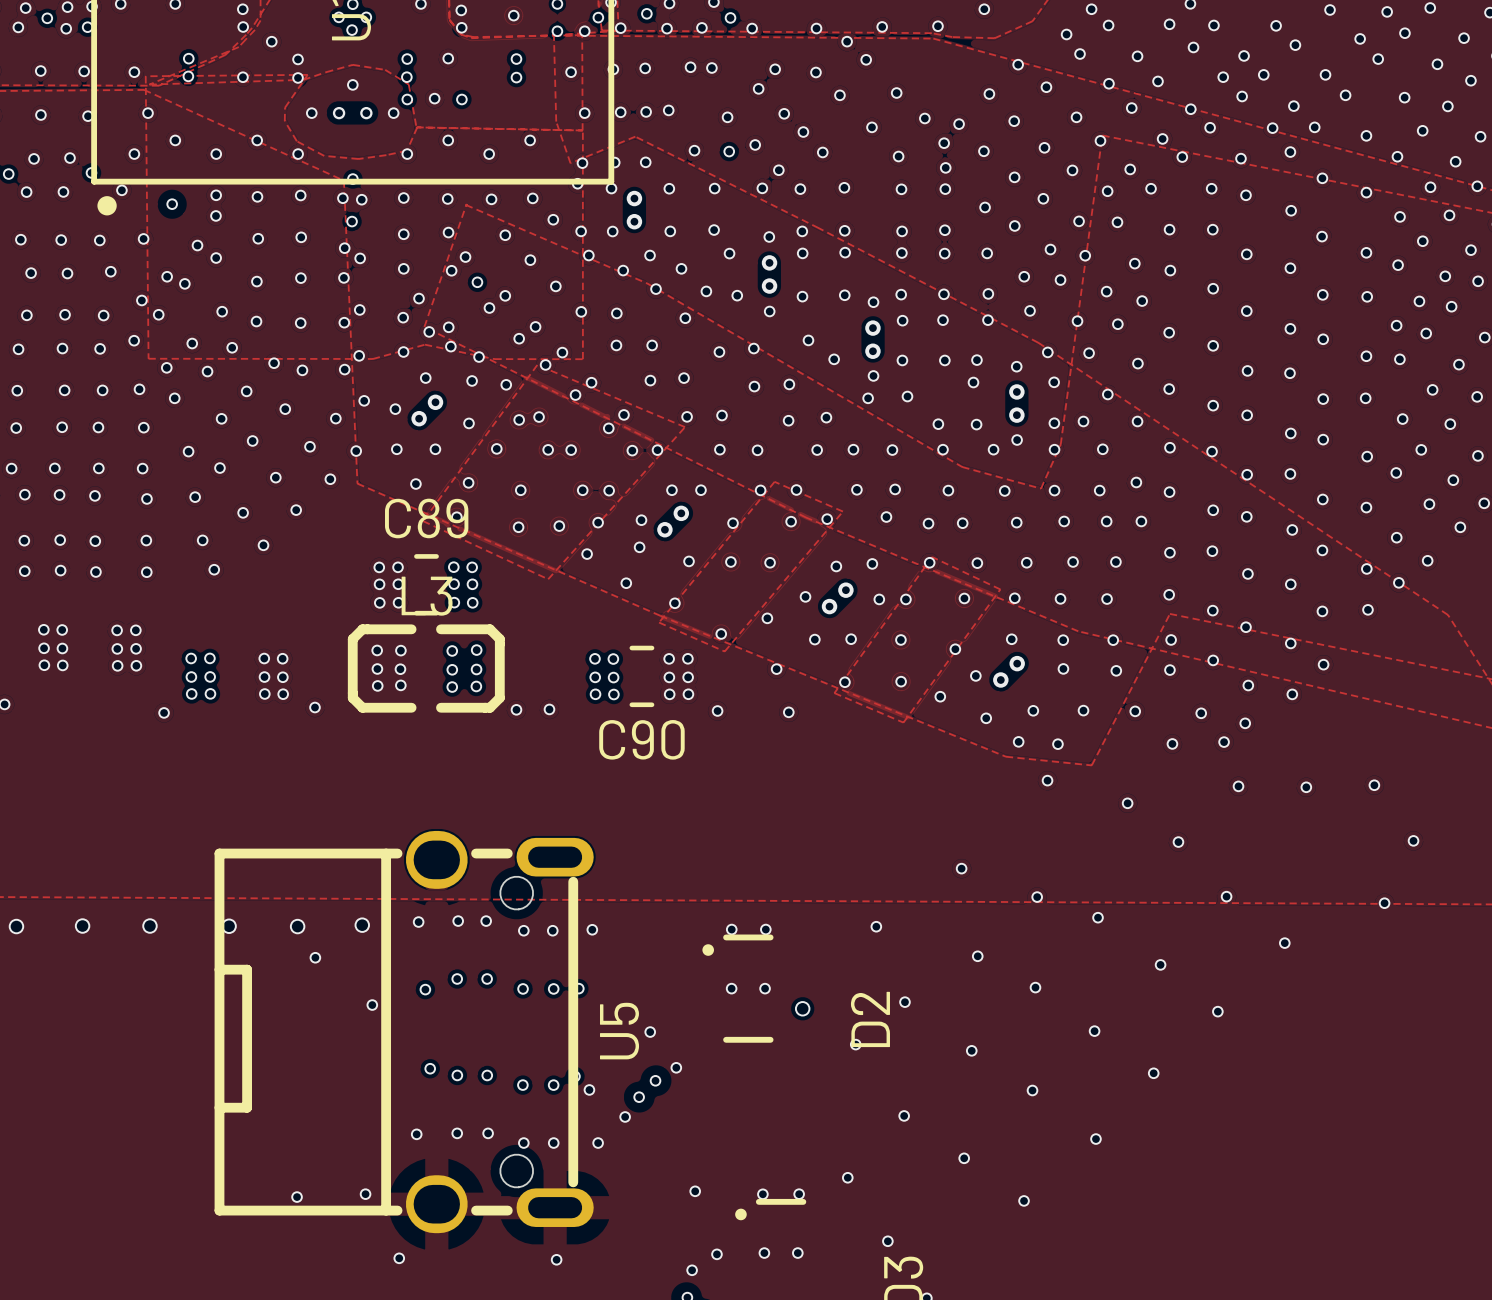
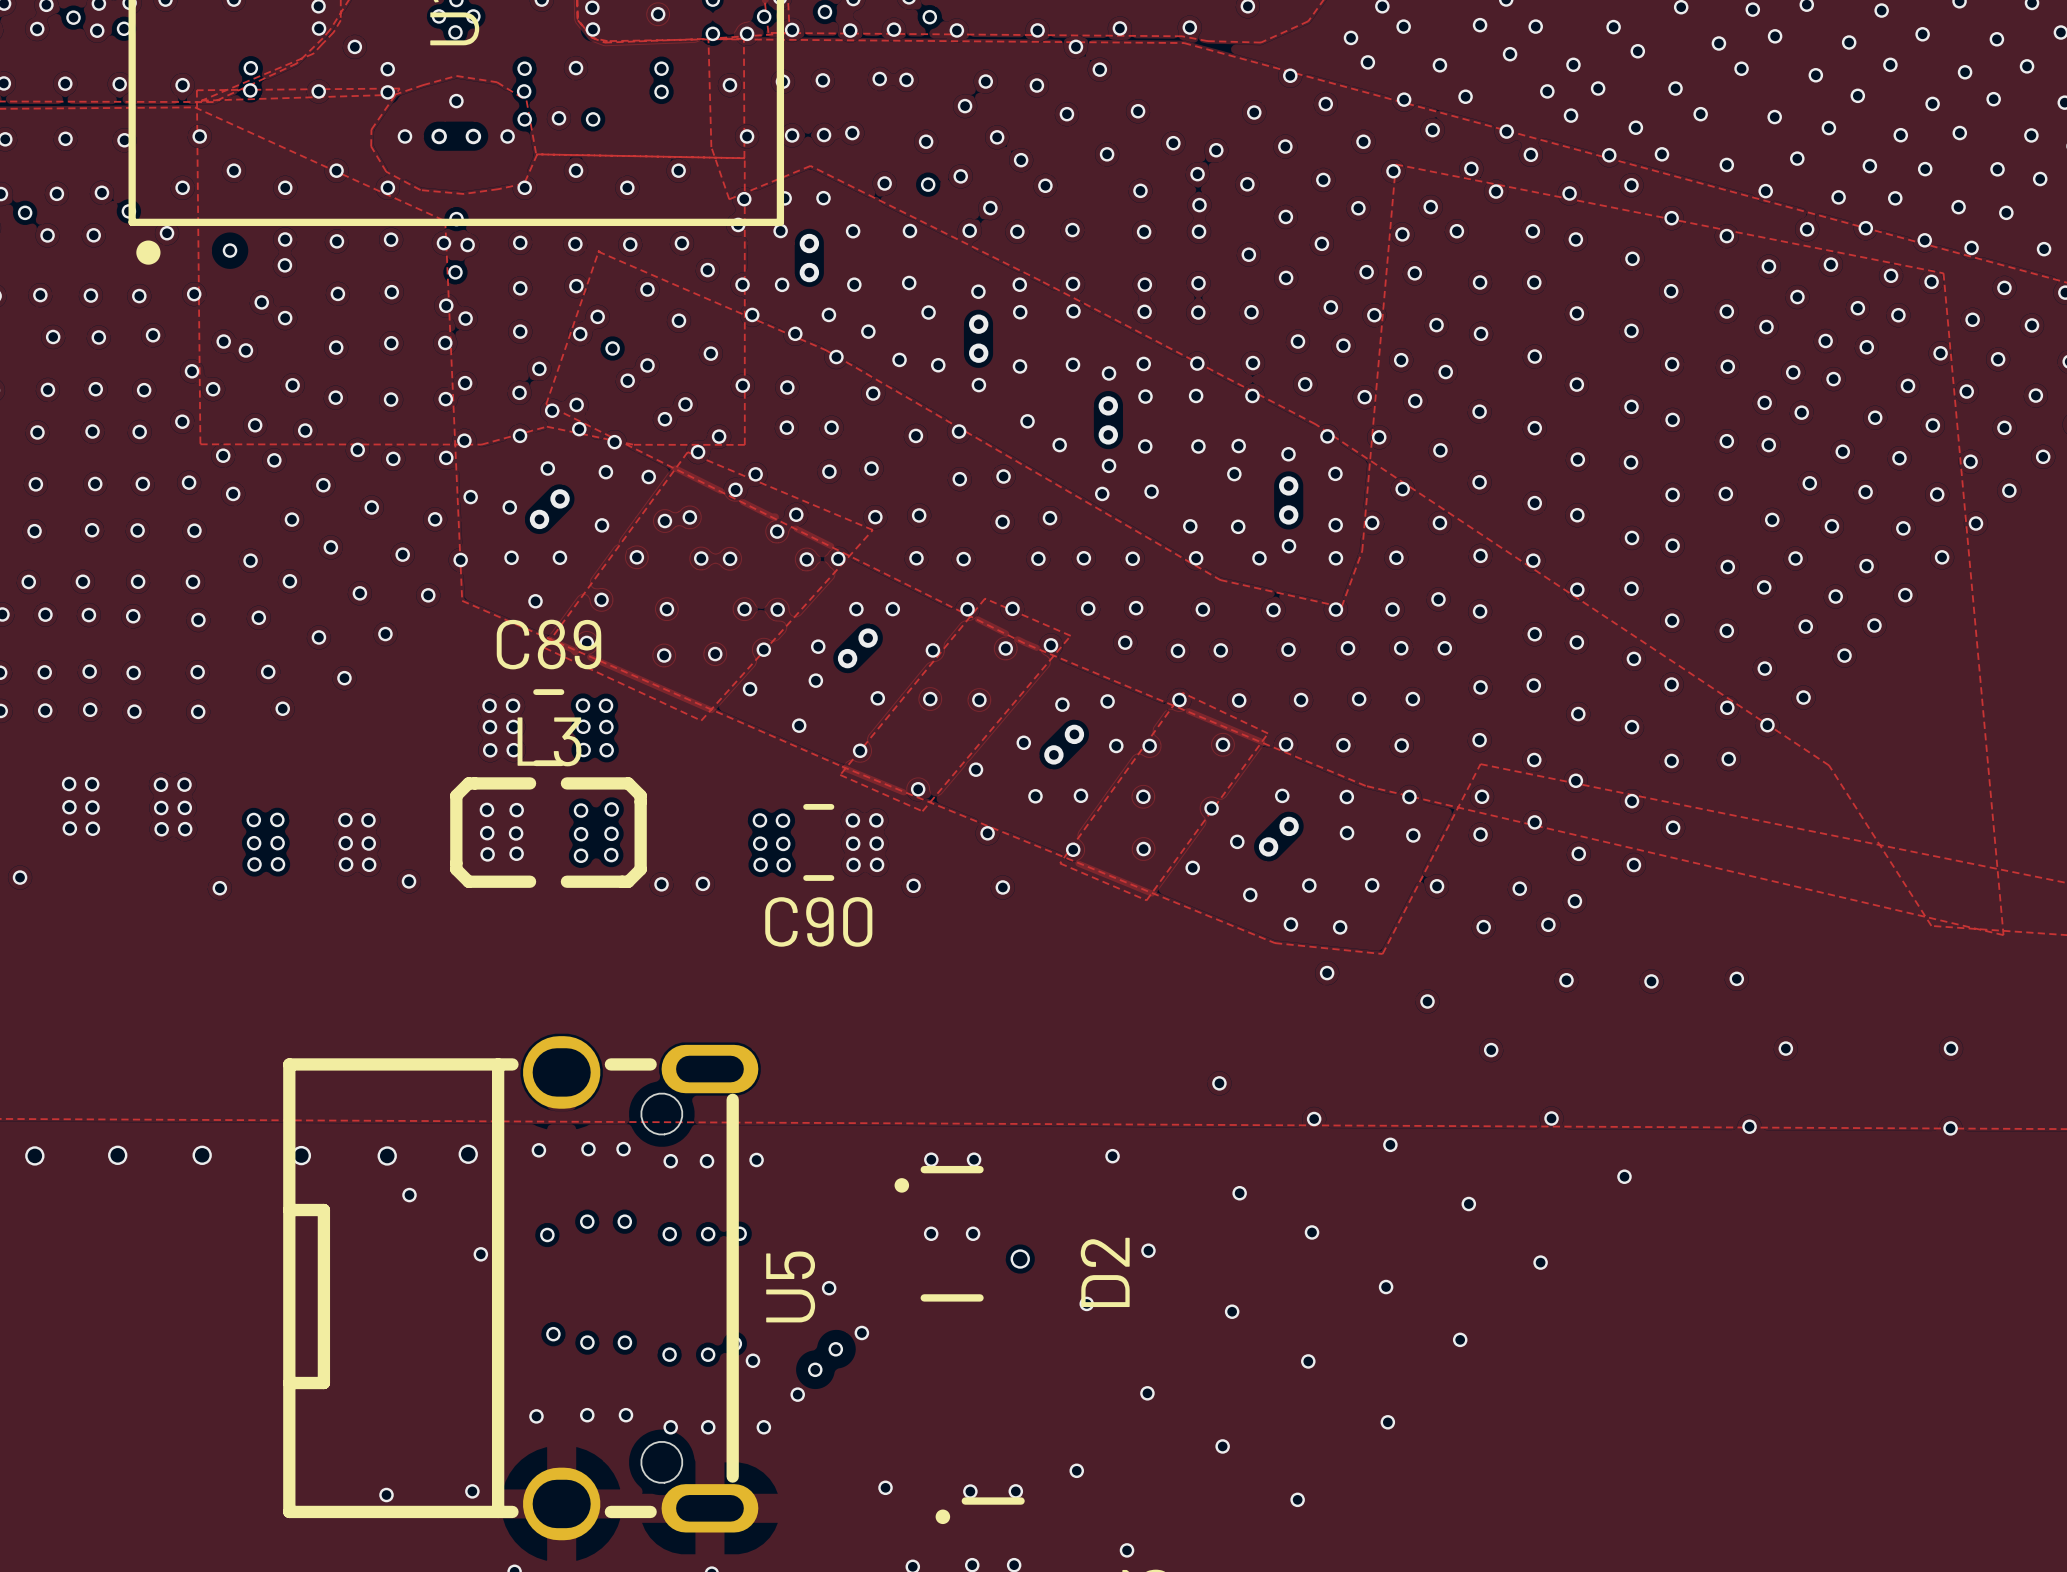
zone outline: (1102, 135) (1060, 444) (1041, 488) (962, 467) -> (1395, 164) (1362, 551) (1341, 606) (1220, 580)

